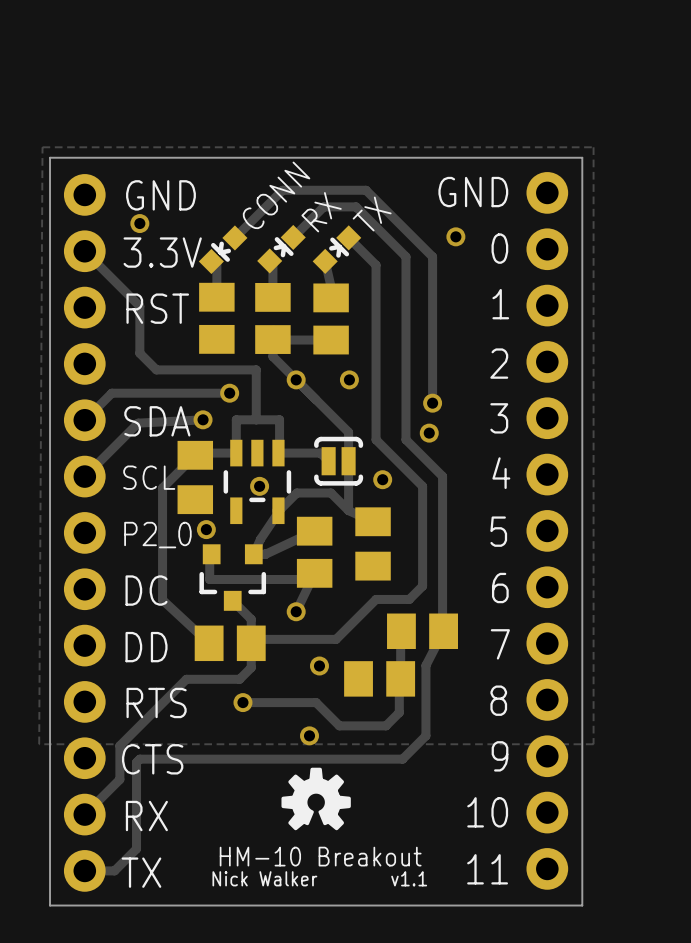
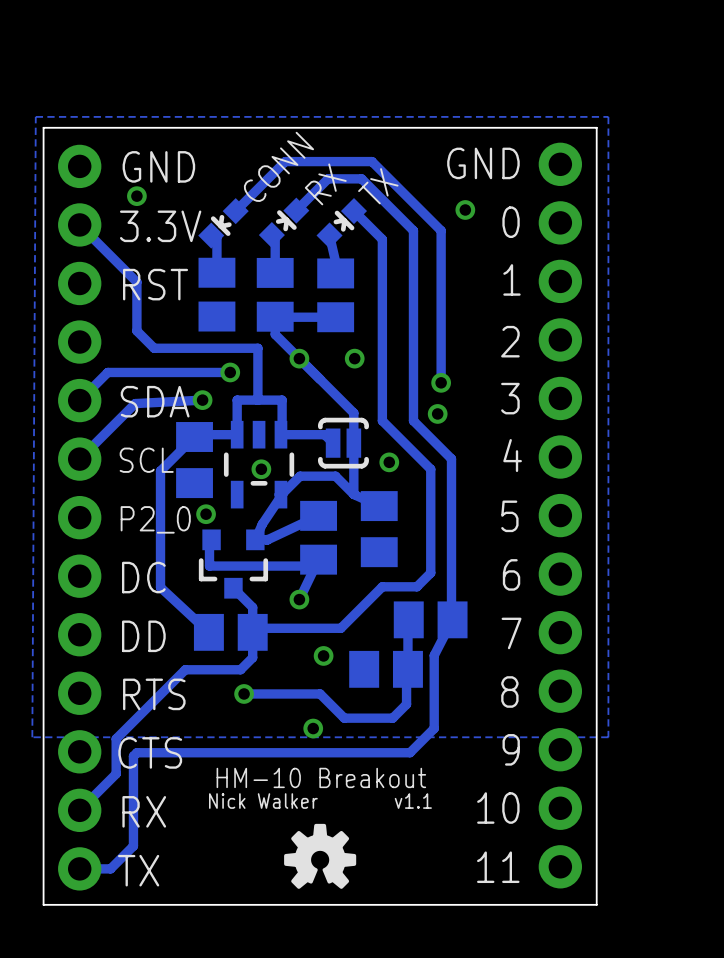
drawing position: (316, 798) -> (320, 856)
text position: HM-10 Breakout (320, 856) -> HM-10 Breakout (321, 777)
text position: Nick Walker (264, 878) -> Nick Walker (263, 801)
text position: v1.1 (409, 878) -> v1.1 (413, 801)

